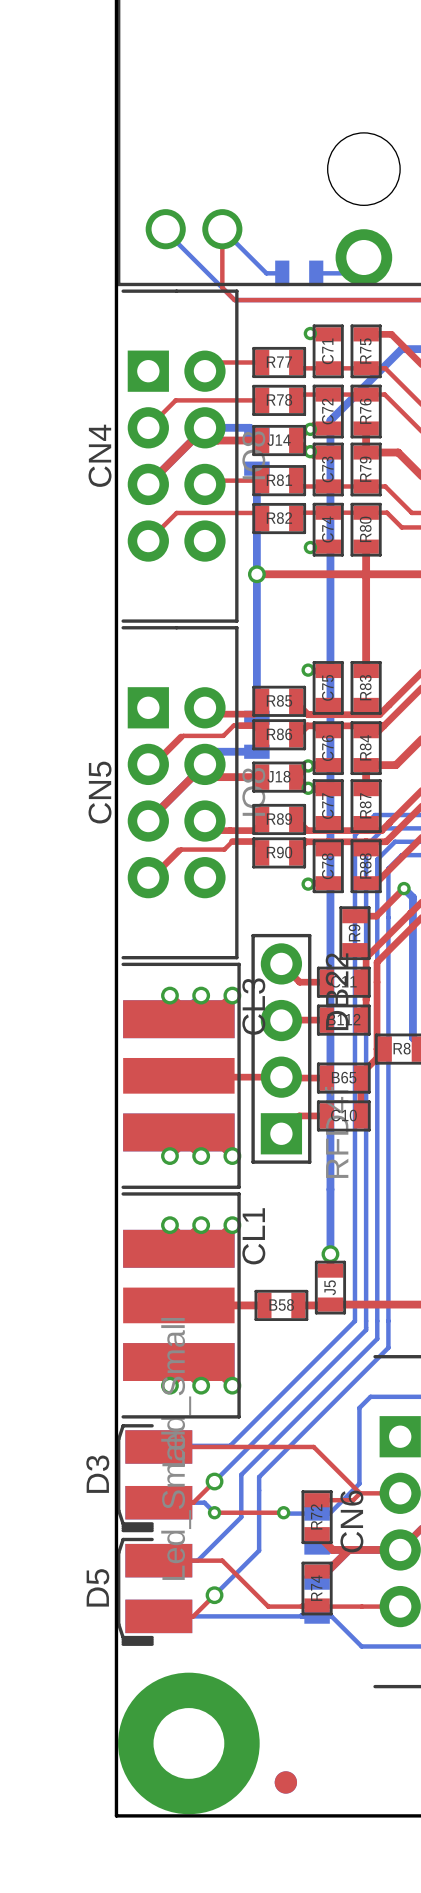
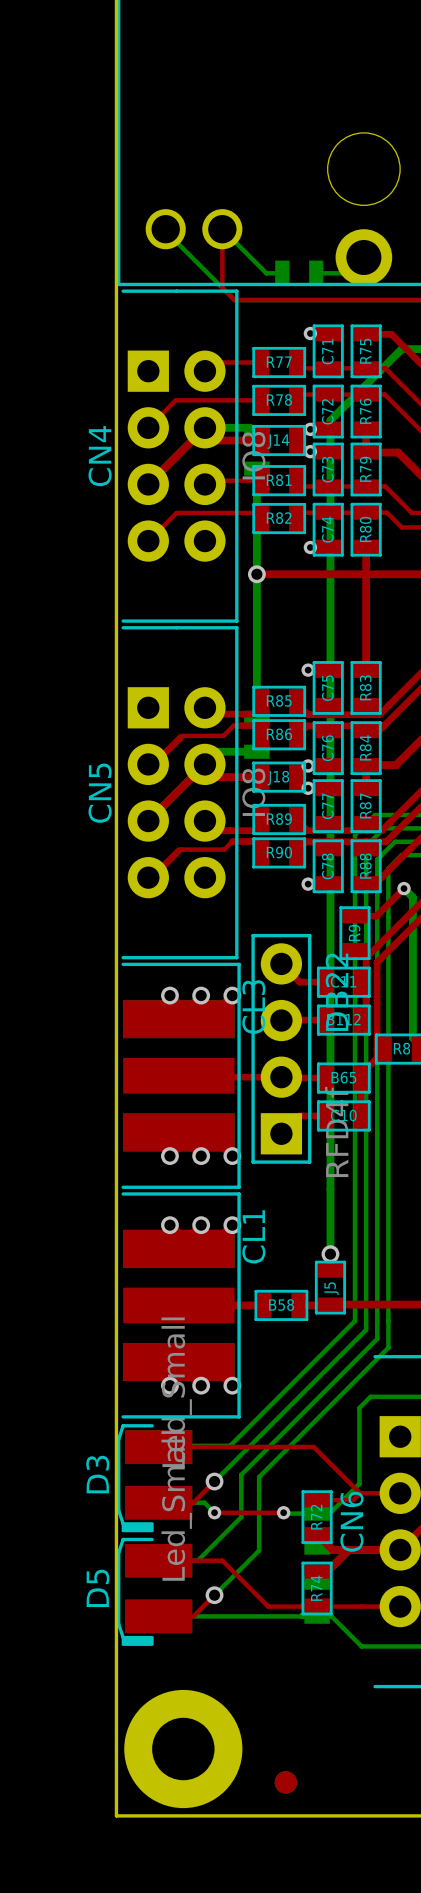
part footprint: [118, 1672, 260, 1815] -> [124, 1689, 243, 1809]

